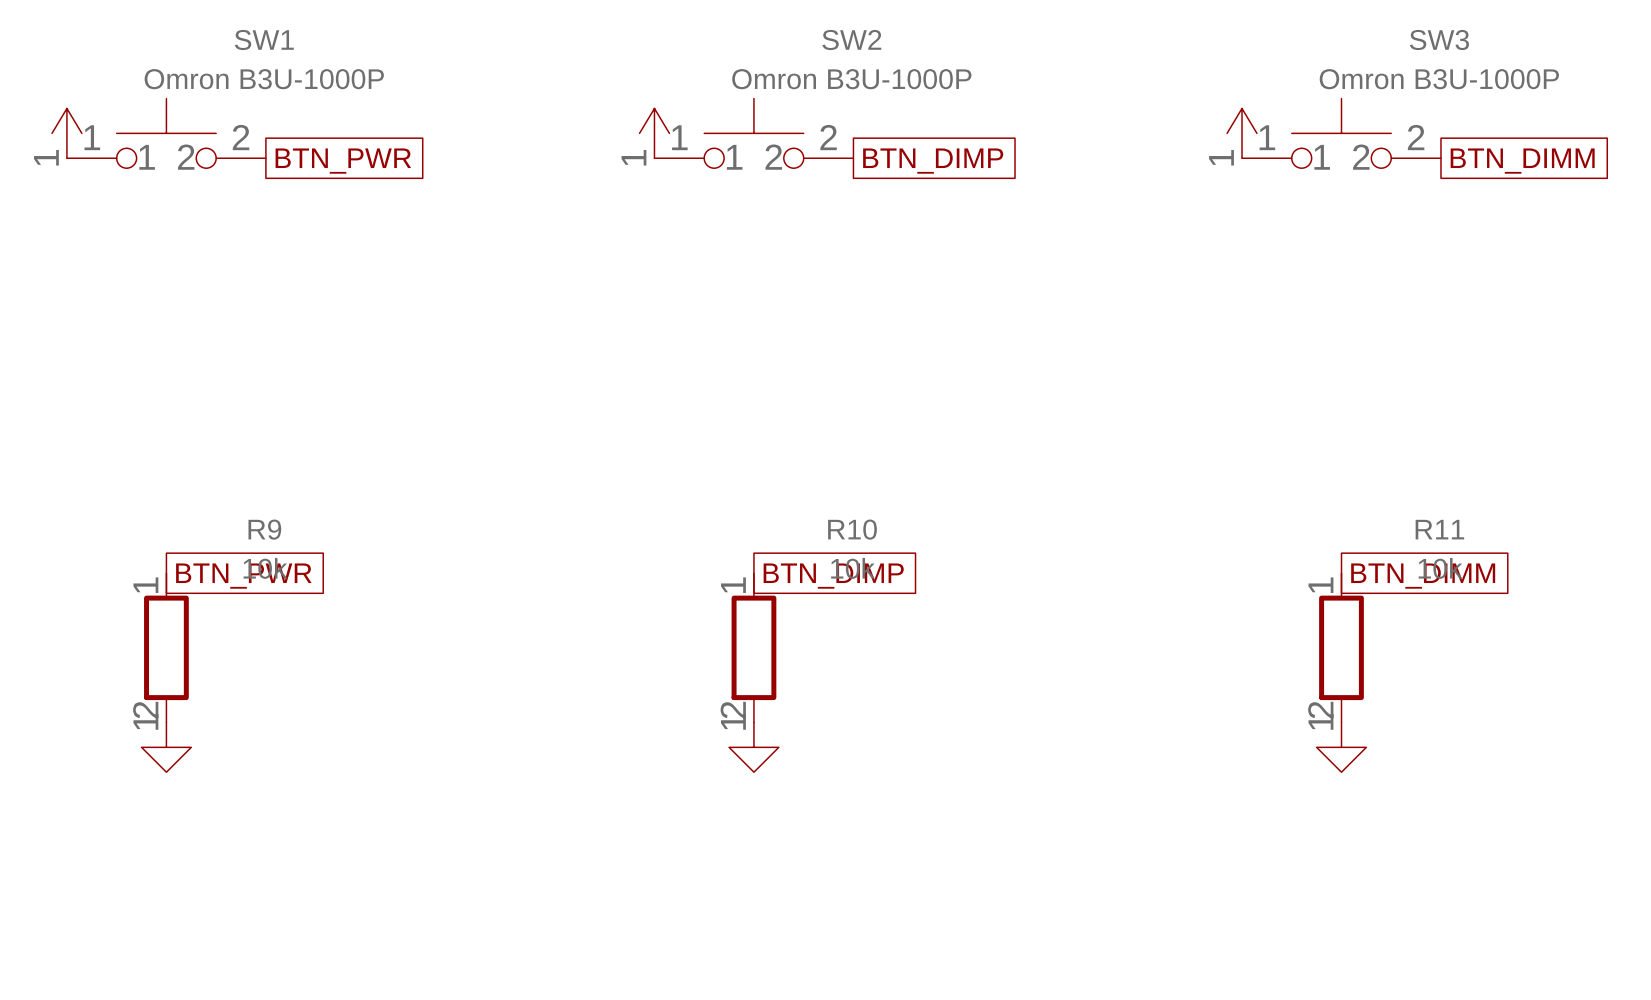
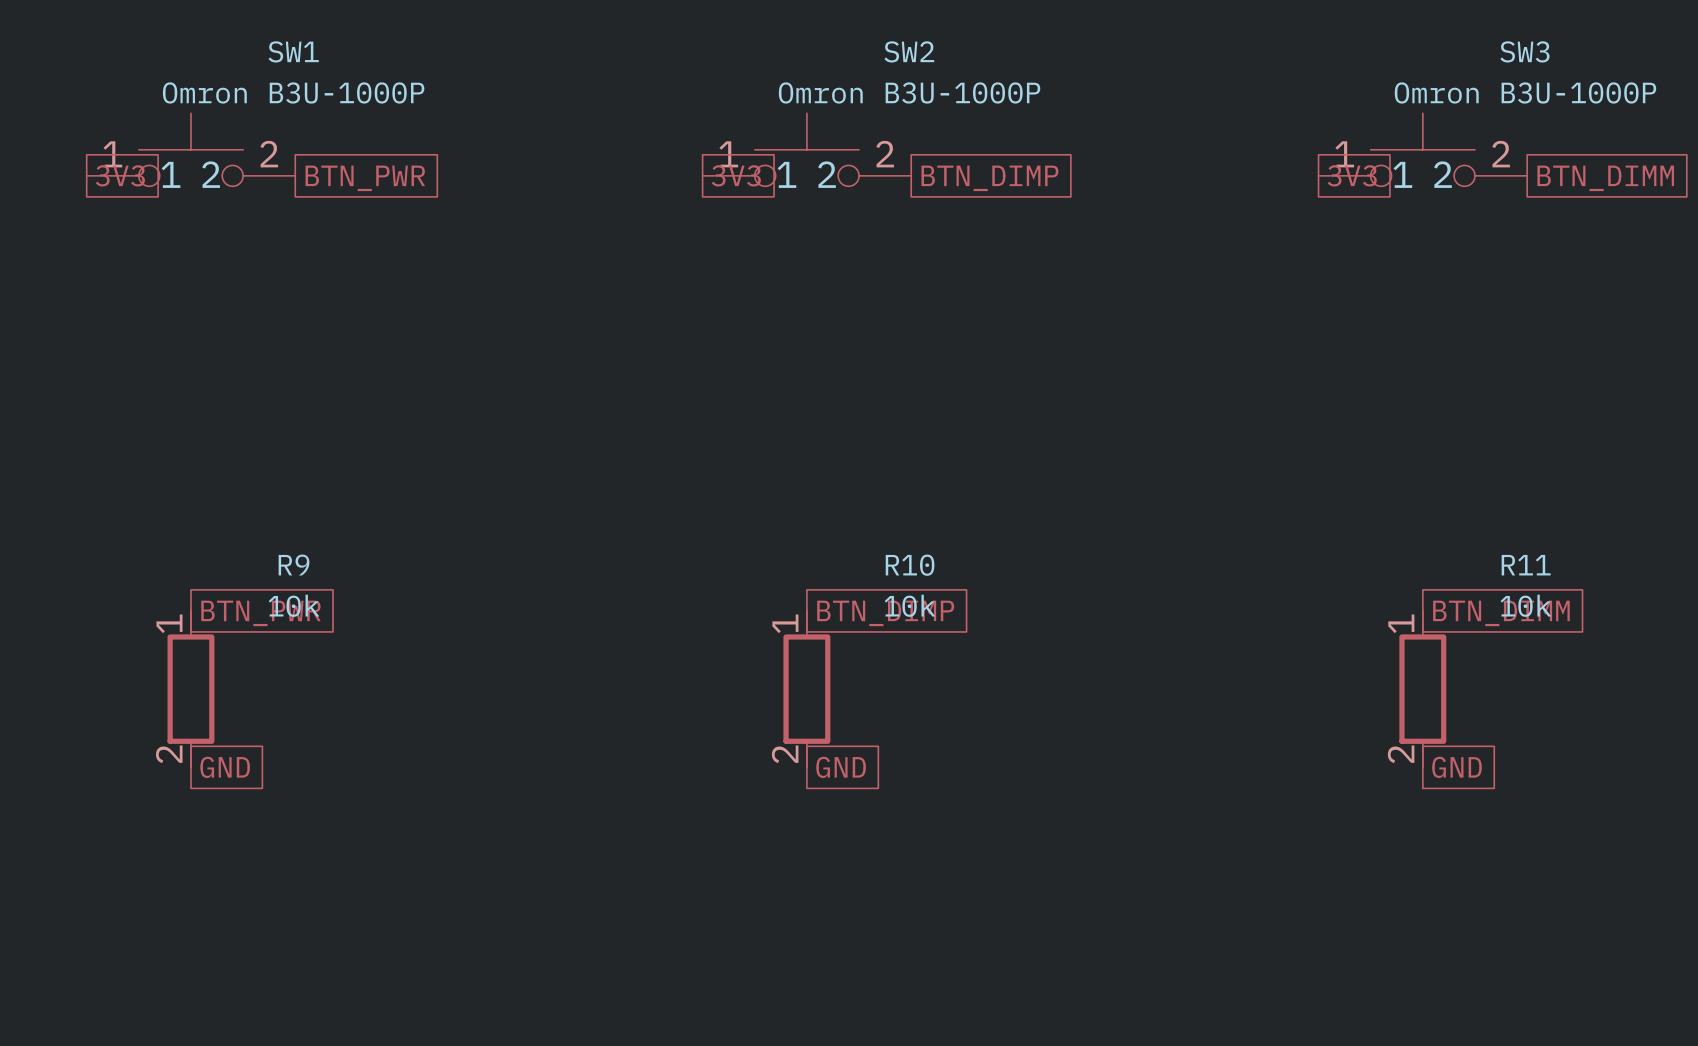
power symbol: (66, 133) -> none
power symbol: (654, 133) -> none
power symbol: (1242, 133) -> none
global label: none -> 3V3 (120, 175)
global label: none -> 3V3 (736, 175)
global label: none -> 3V3 (1352, 175)
global label: none -> GND (225, 767)
global label: none -> GND (841, 767)
global label: none -> GND (1457, 767)
power symbol: (166, 747) -> none
power symbol: (753, 747) -> none
power symbol: (1341, 747) -> none

